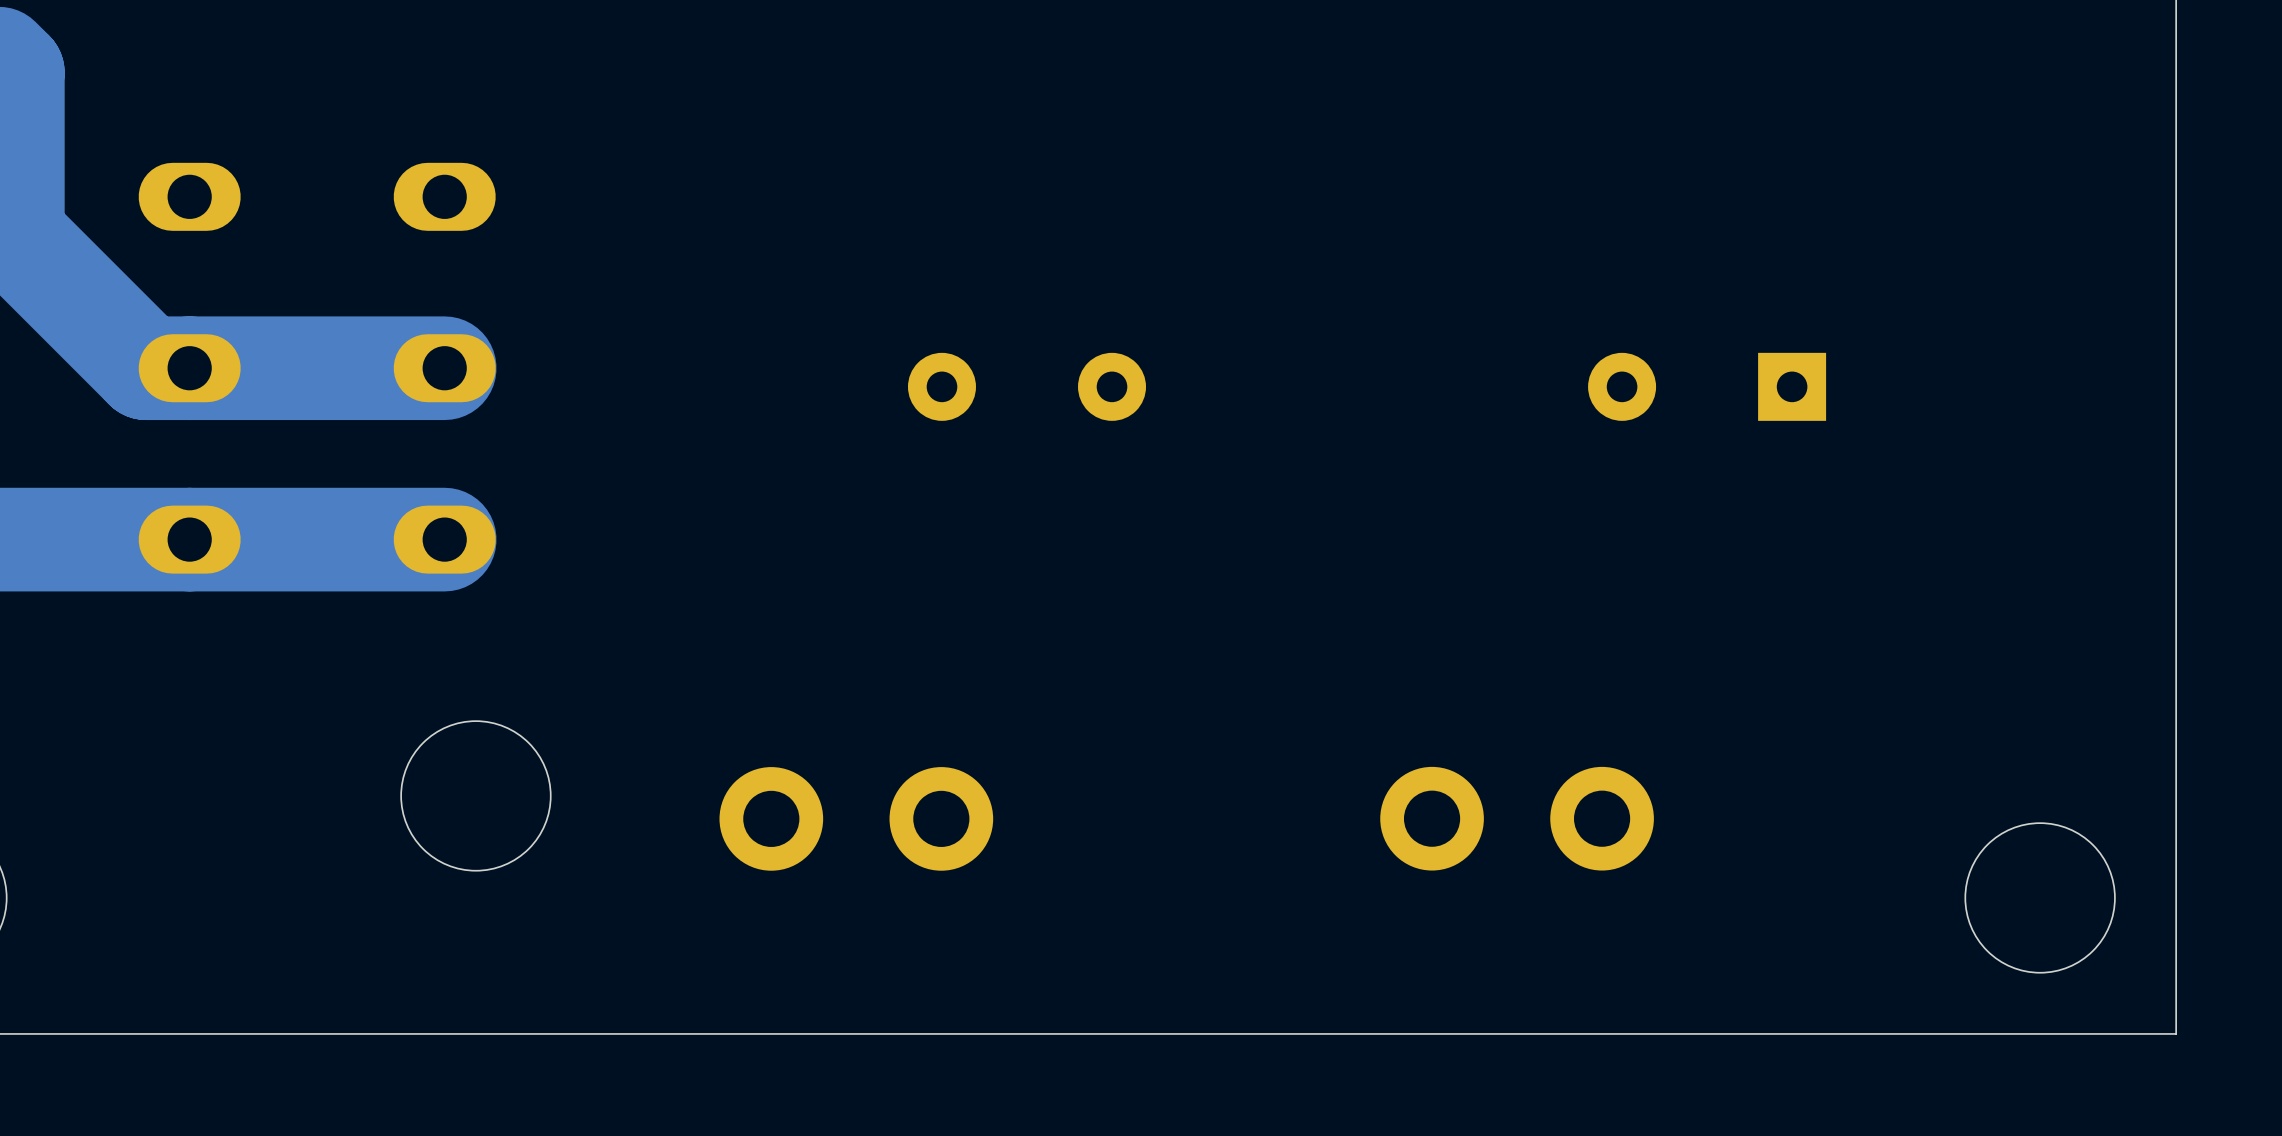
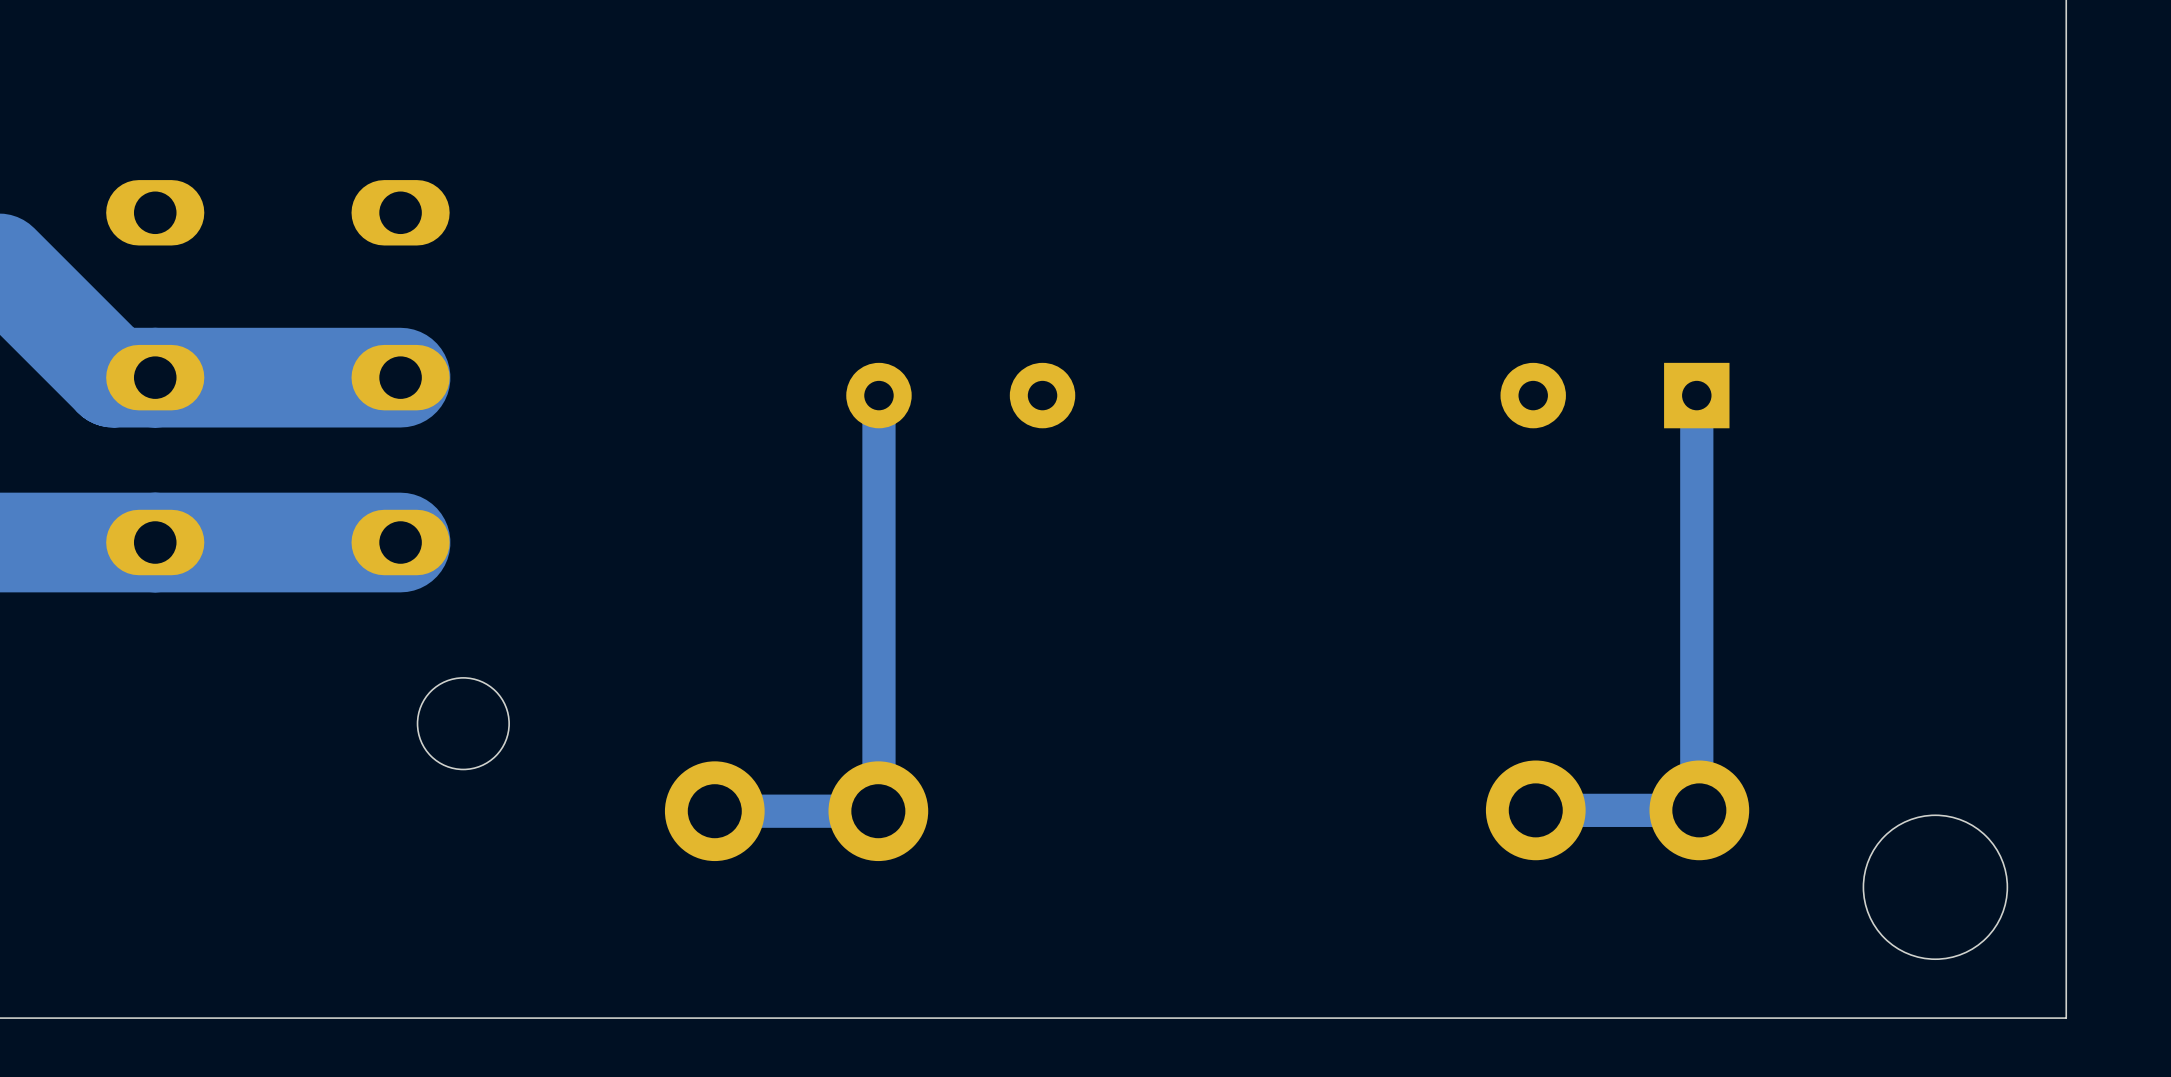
track: none -> (878, 395) (878, 810) (714, 811)
track: none -> (1696, 395) (1696, 807) (1699, 810) (1535, 810)
round board edge: none -> [416, 677, 510, 771]
round board edge: [400, 720, 552, 872] -> none
part position: (1517, 818) -> (1617, 810)

